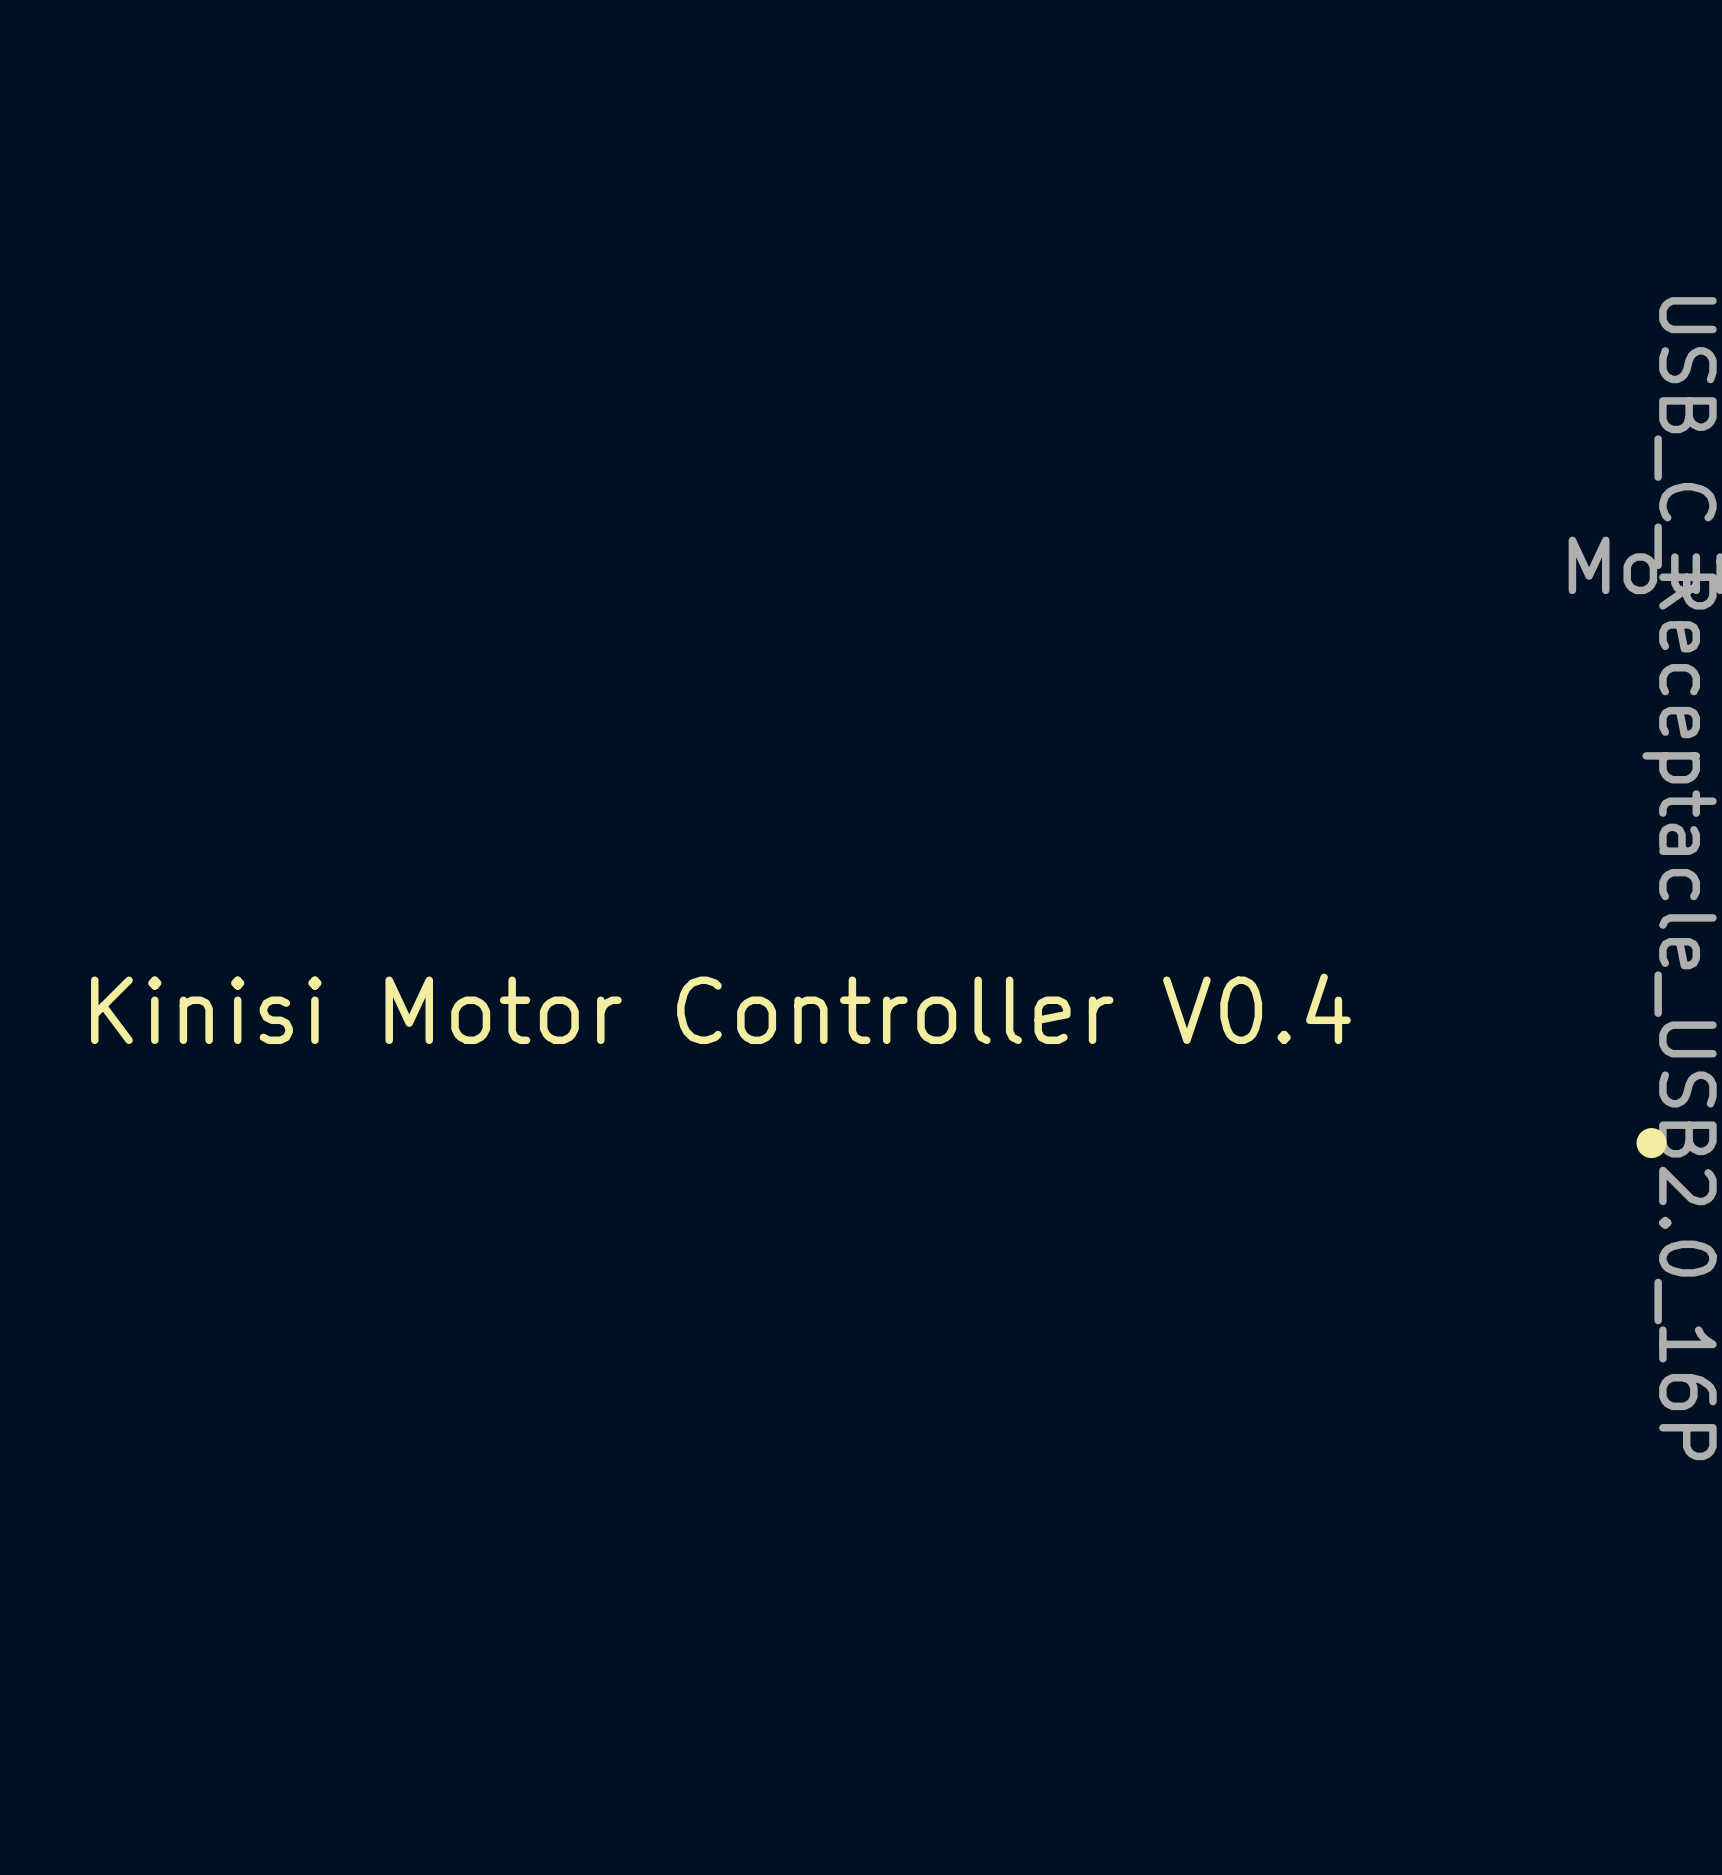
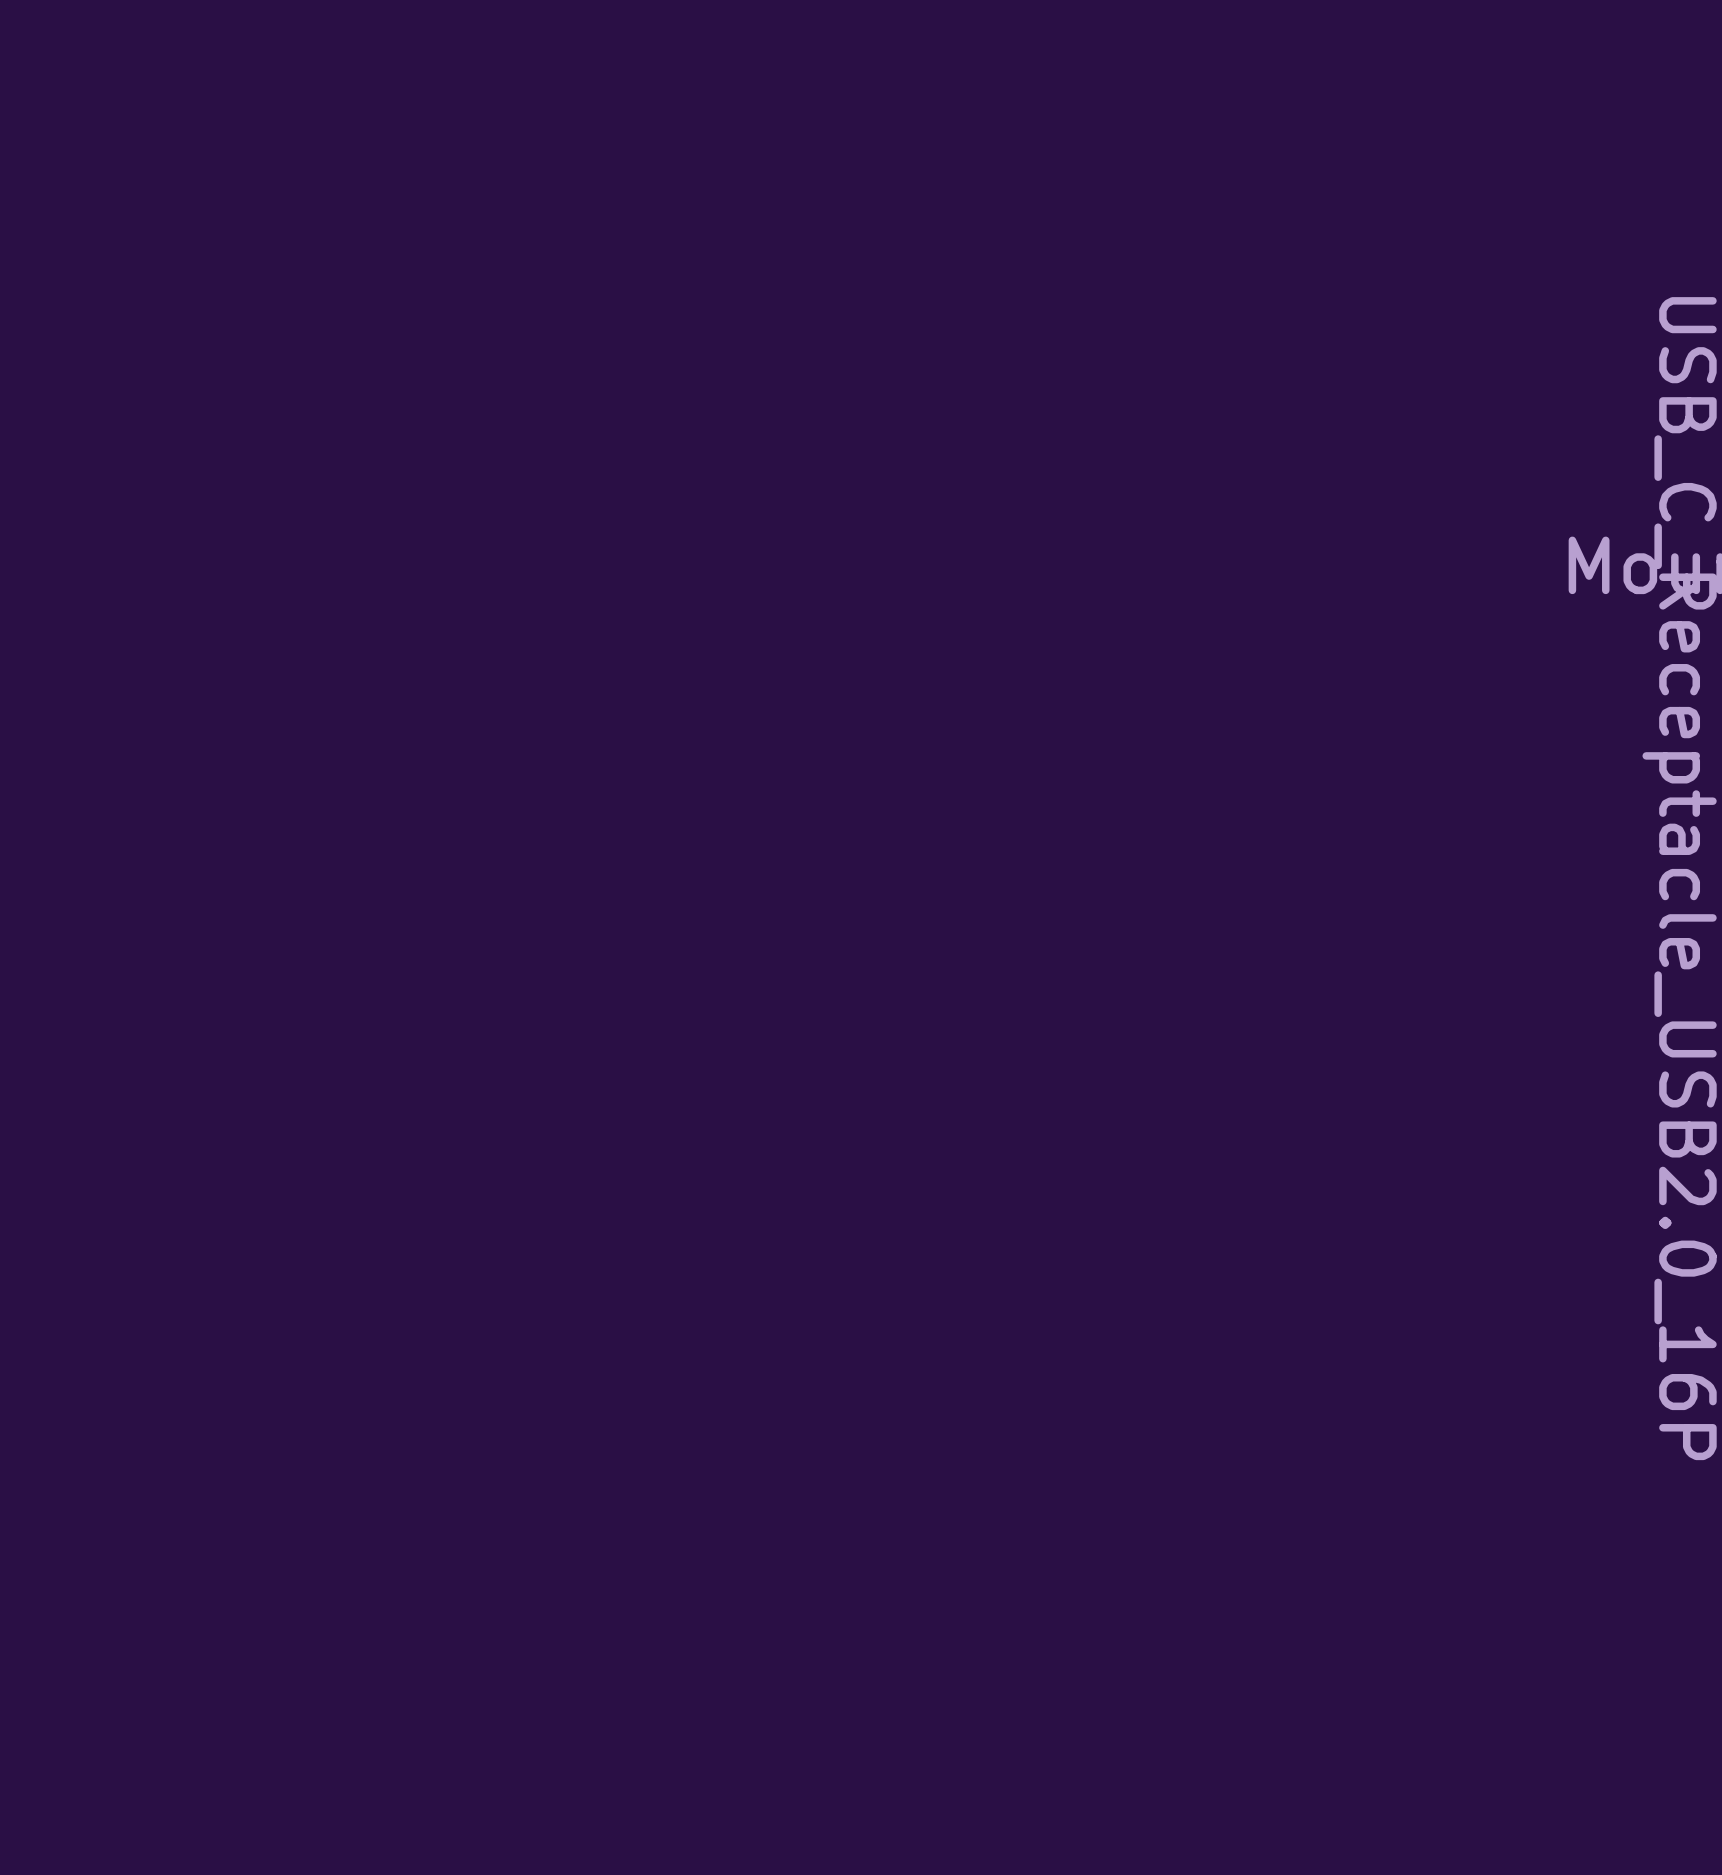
text: Kinisi Motor Controller V0.4 (720, 1008) -> none
drawing: [1636, 1128, 1667, 1159] -> none

